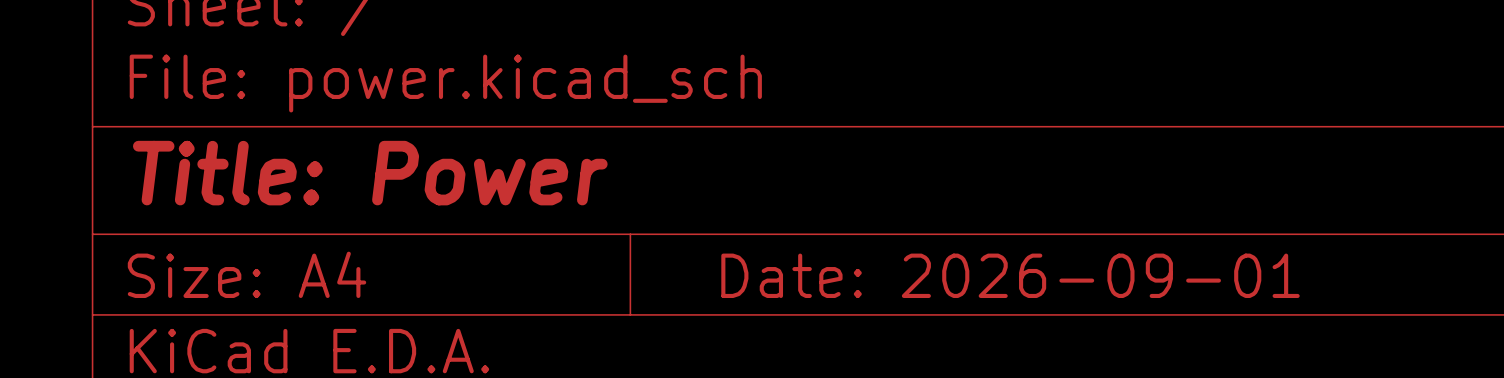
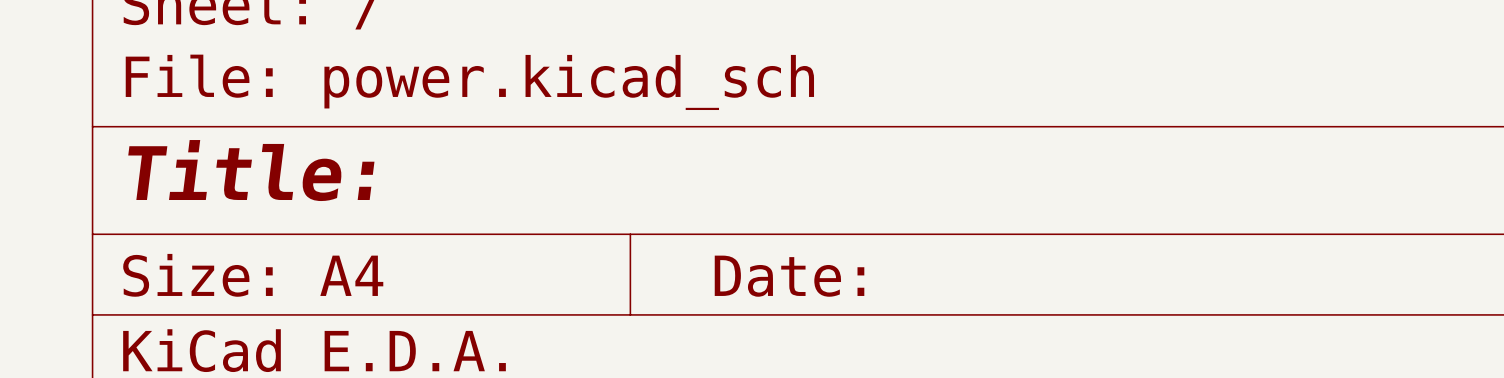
title block: Title: Power (370, 173) -> Title: (251, 170)
title block: Date: 2026-09-01 (1010, 275) -> Date: (789, 276)

